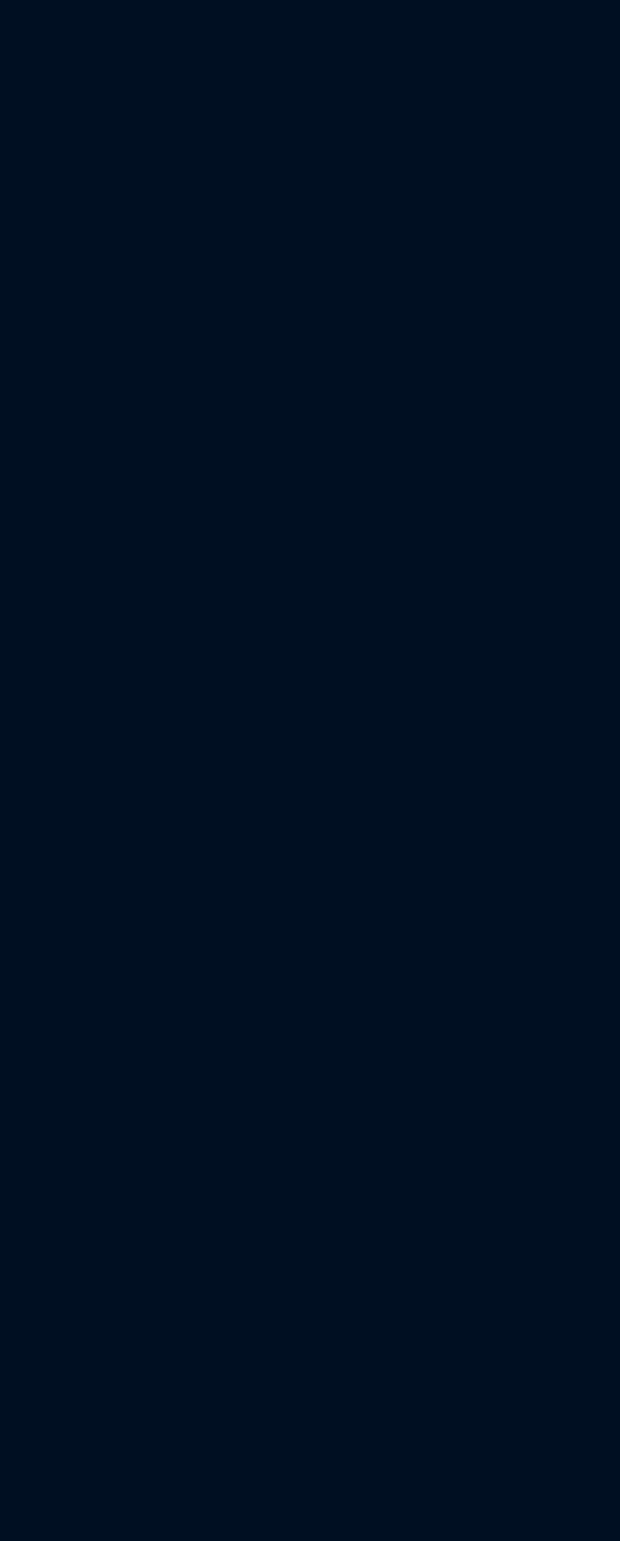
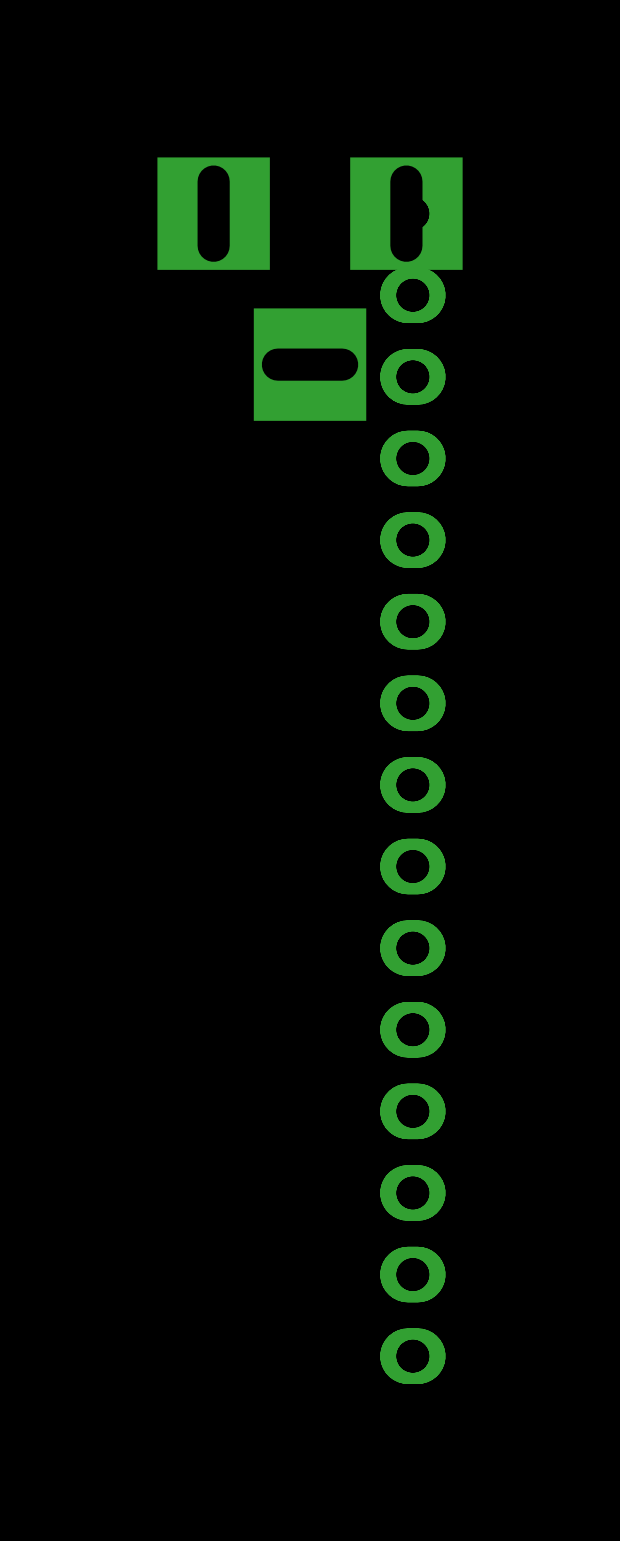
part: none -> (310, 289)
part: none -> (412, 784)

